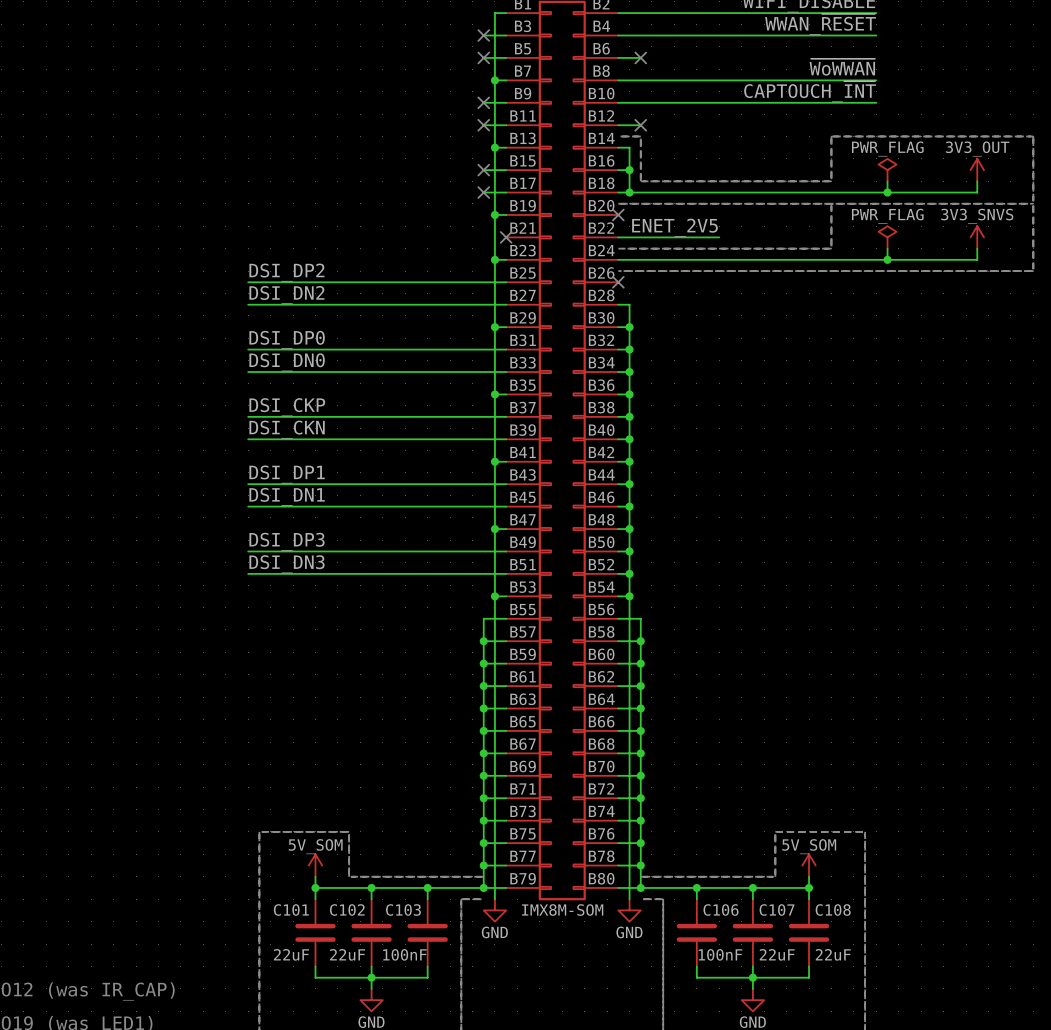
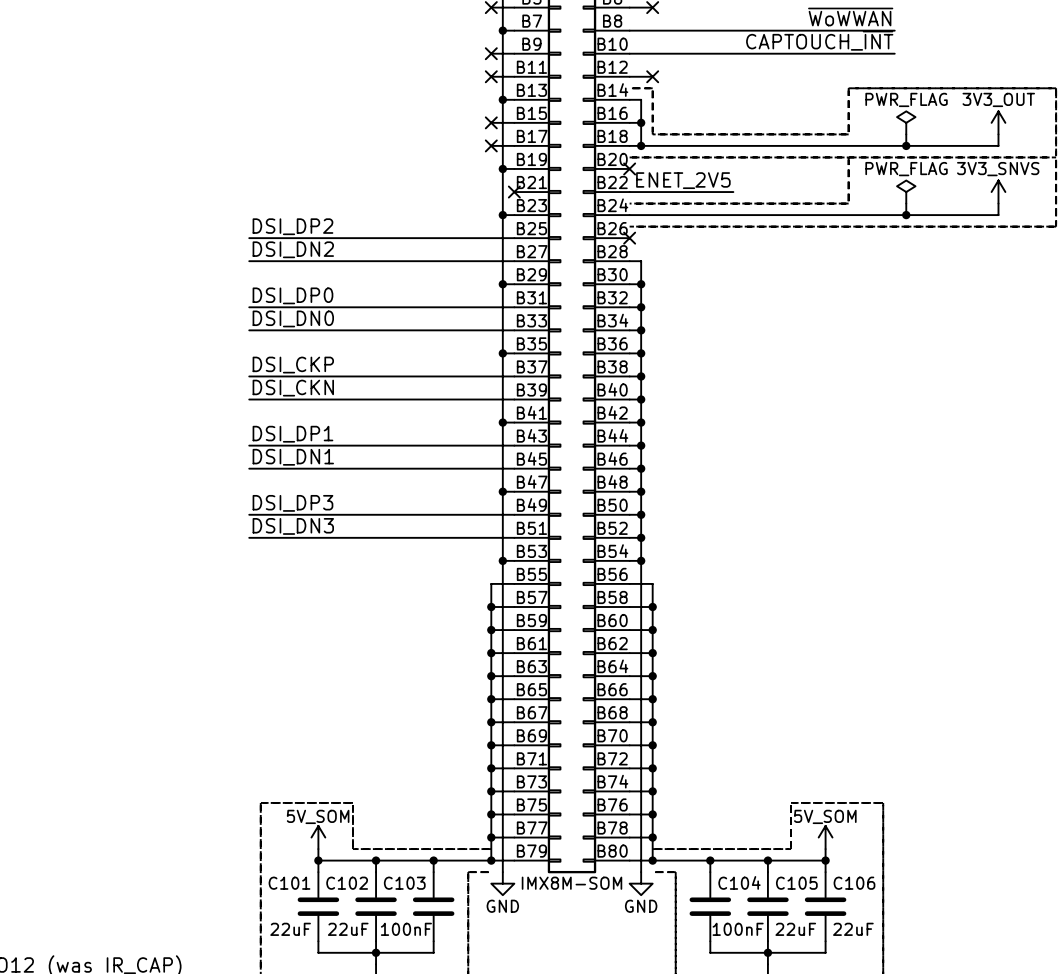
C106 name: C106 (721, 910) -> C104 (739, 882)
C107 name: C107 (777, 910) -> C105 (796, 883)
C108 name: C108 (833, 910) -> C106 (854, 883)

